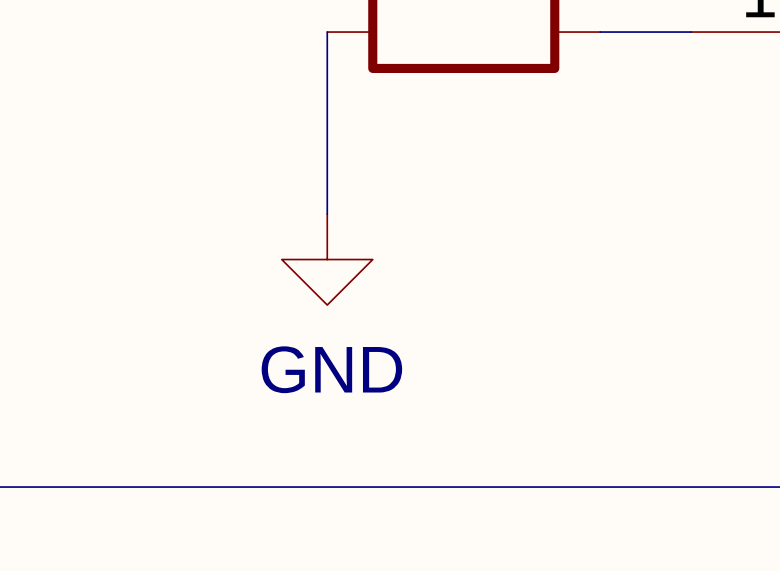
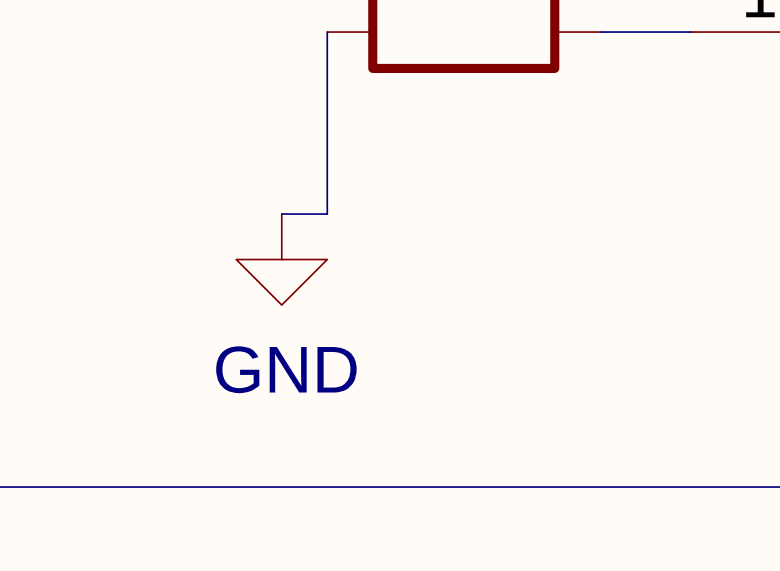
wire: none -> (281, 214) (327, 214)
power symbol position: GND (327, 259) -> GND (281, 259)

